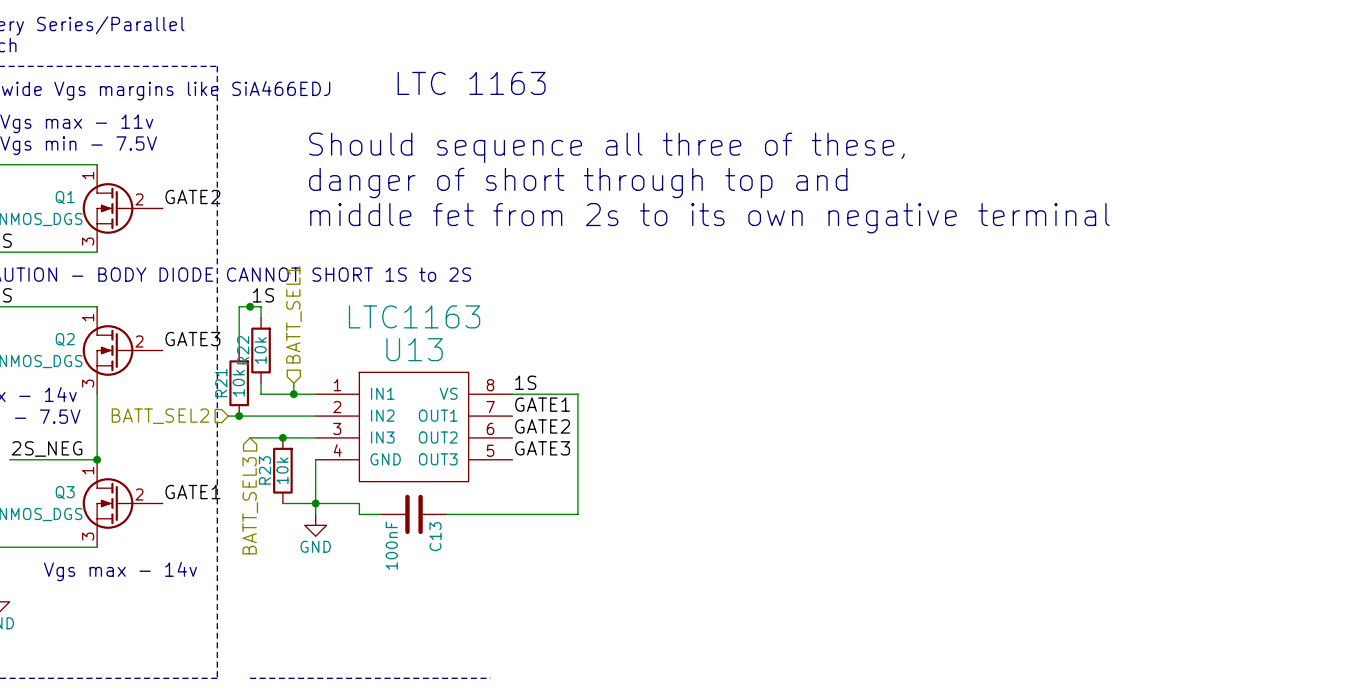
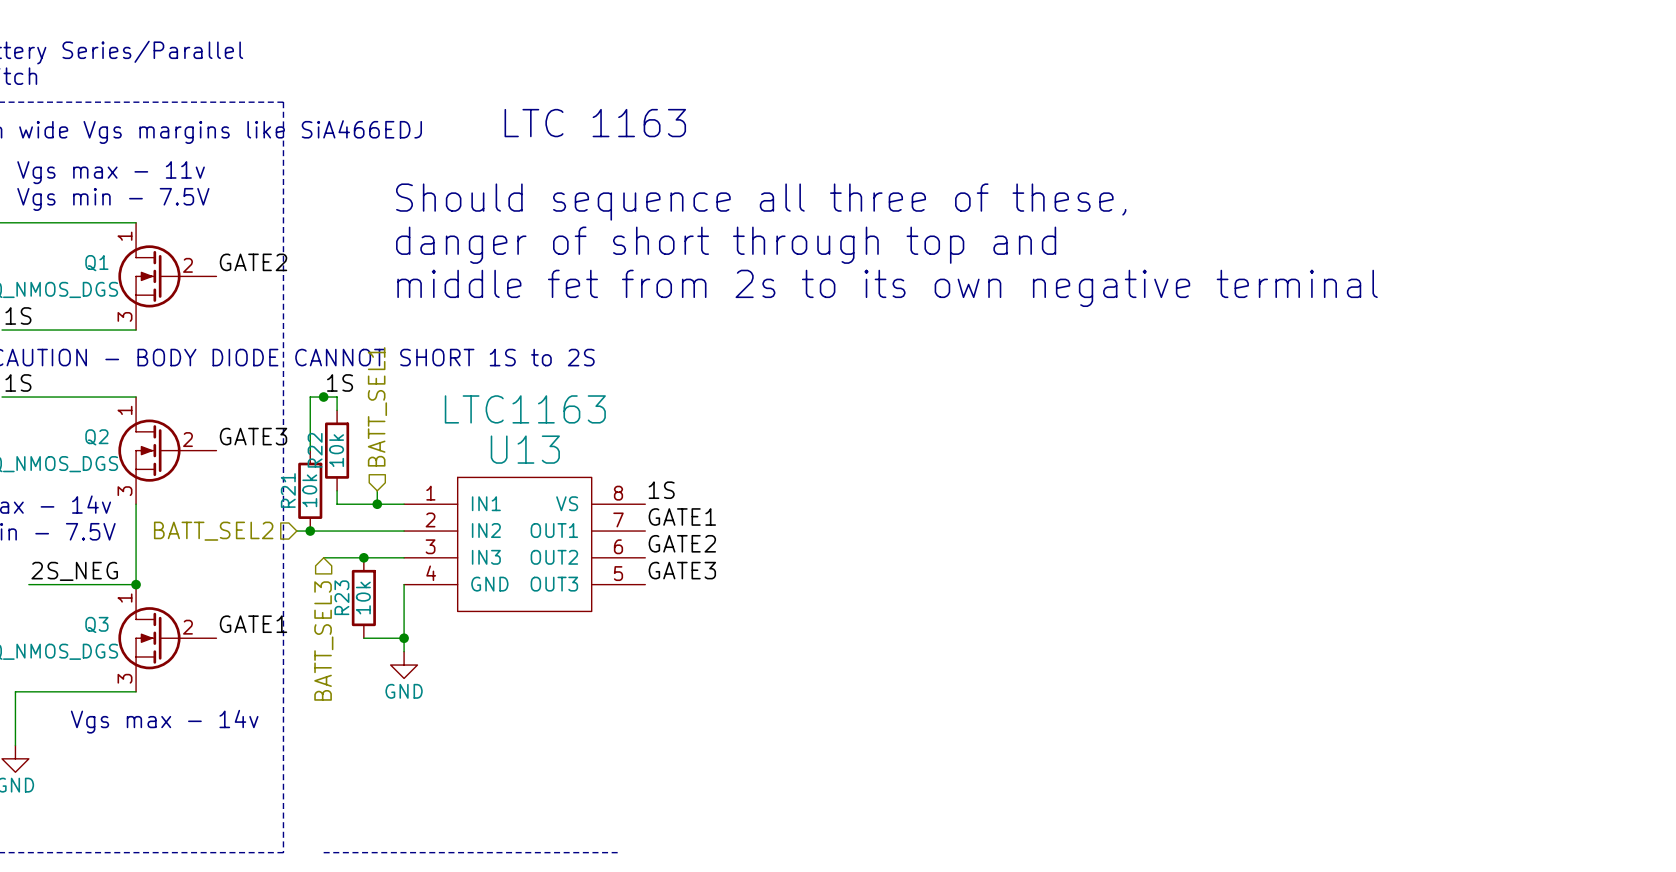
wire: (512, 394) (577, 394) (577, 514) (446, 514) -> none
wire: (315, 503) (359, 503) (359, 514) (381, 514) -> none
C13: 100nF (414, 514) -> none

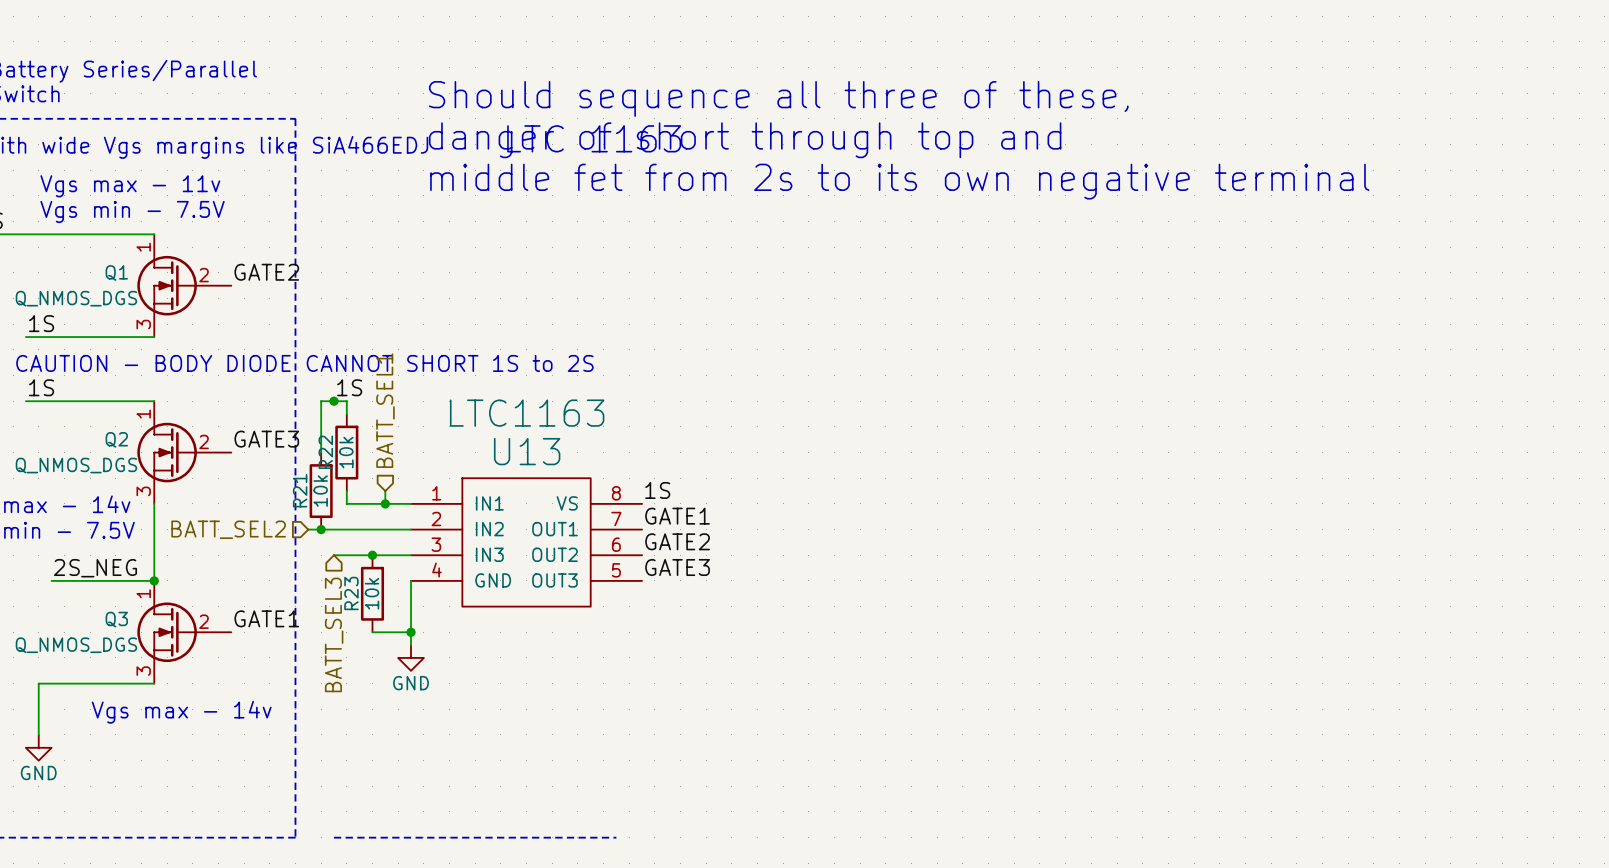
text position: Should sequence all three of these, (761, 202) -> Should sequence all three of these, (778, 98)
text position: danger of short through top and (726, 245) -> danger of short through top and (745, 140)
text position: middle fet from 2s to its own negative terminal (887, 288) -> middle fet from 2s to its own negative terminal (899, 181)

